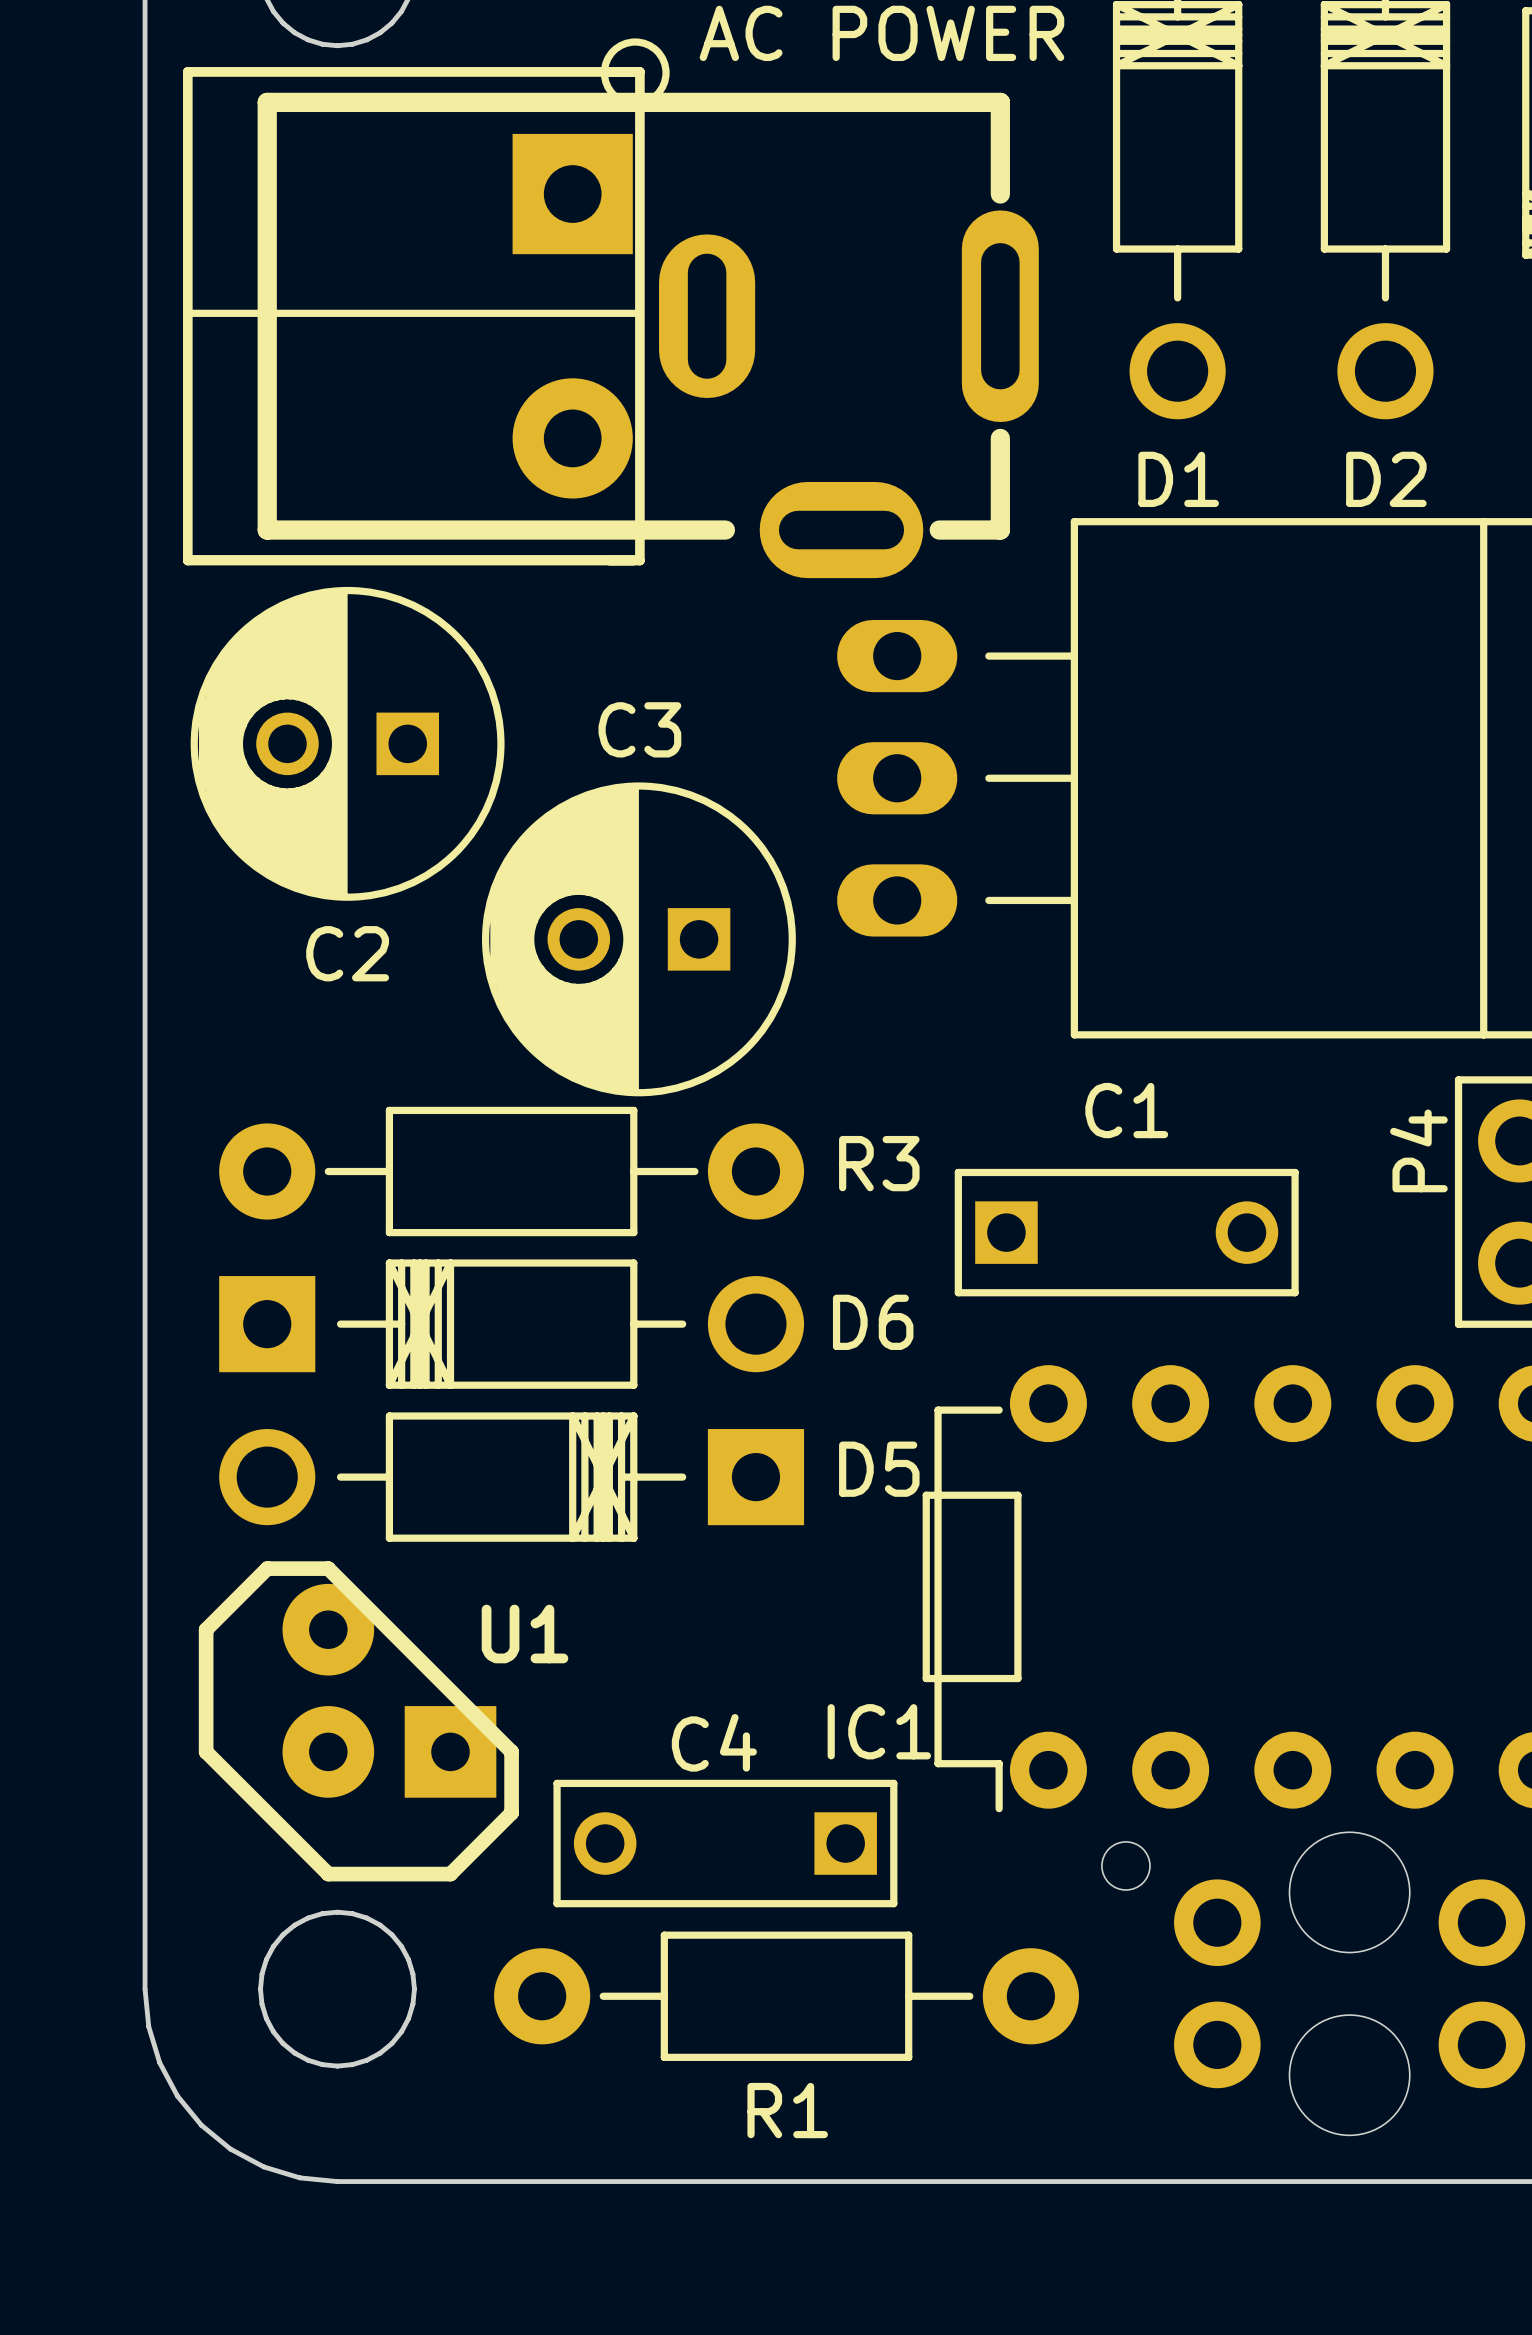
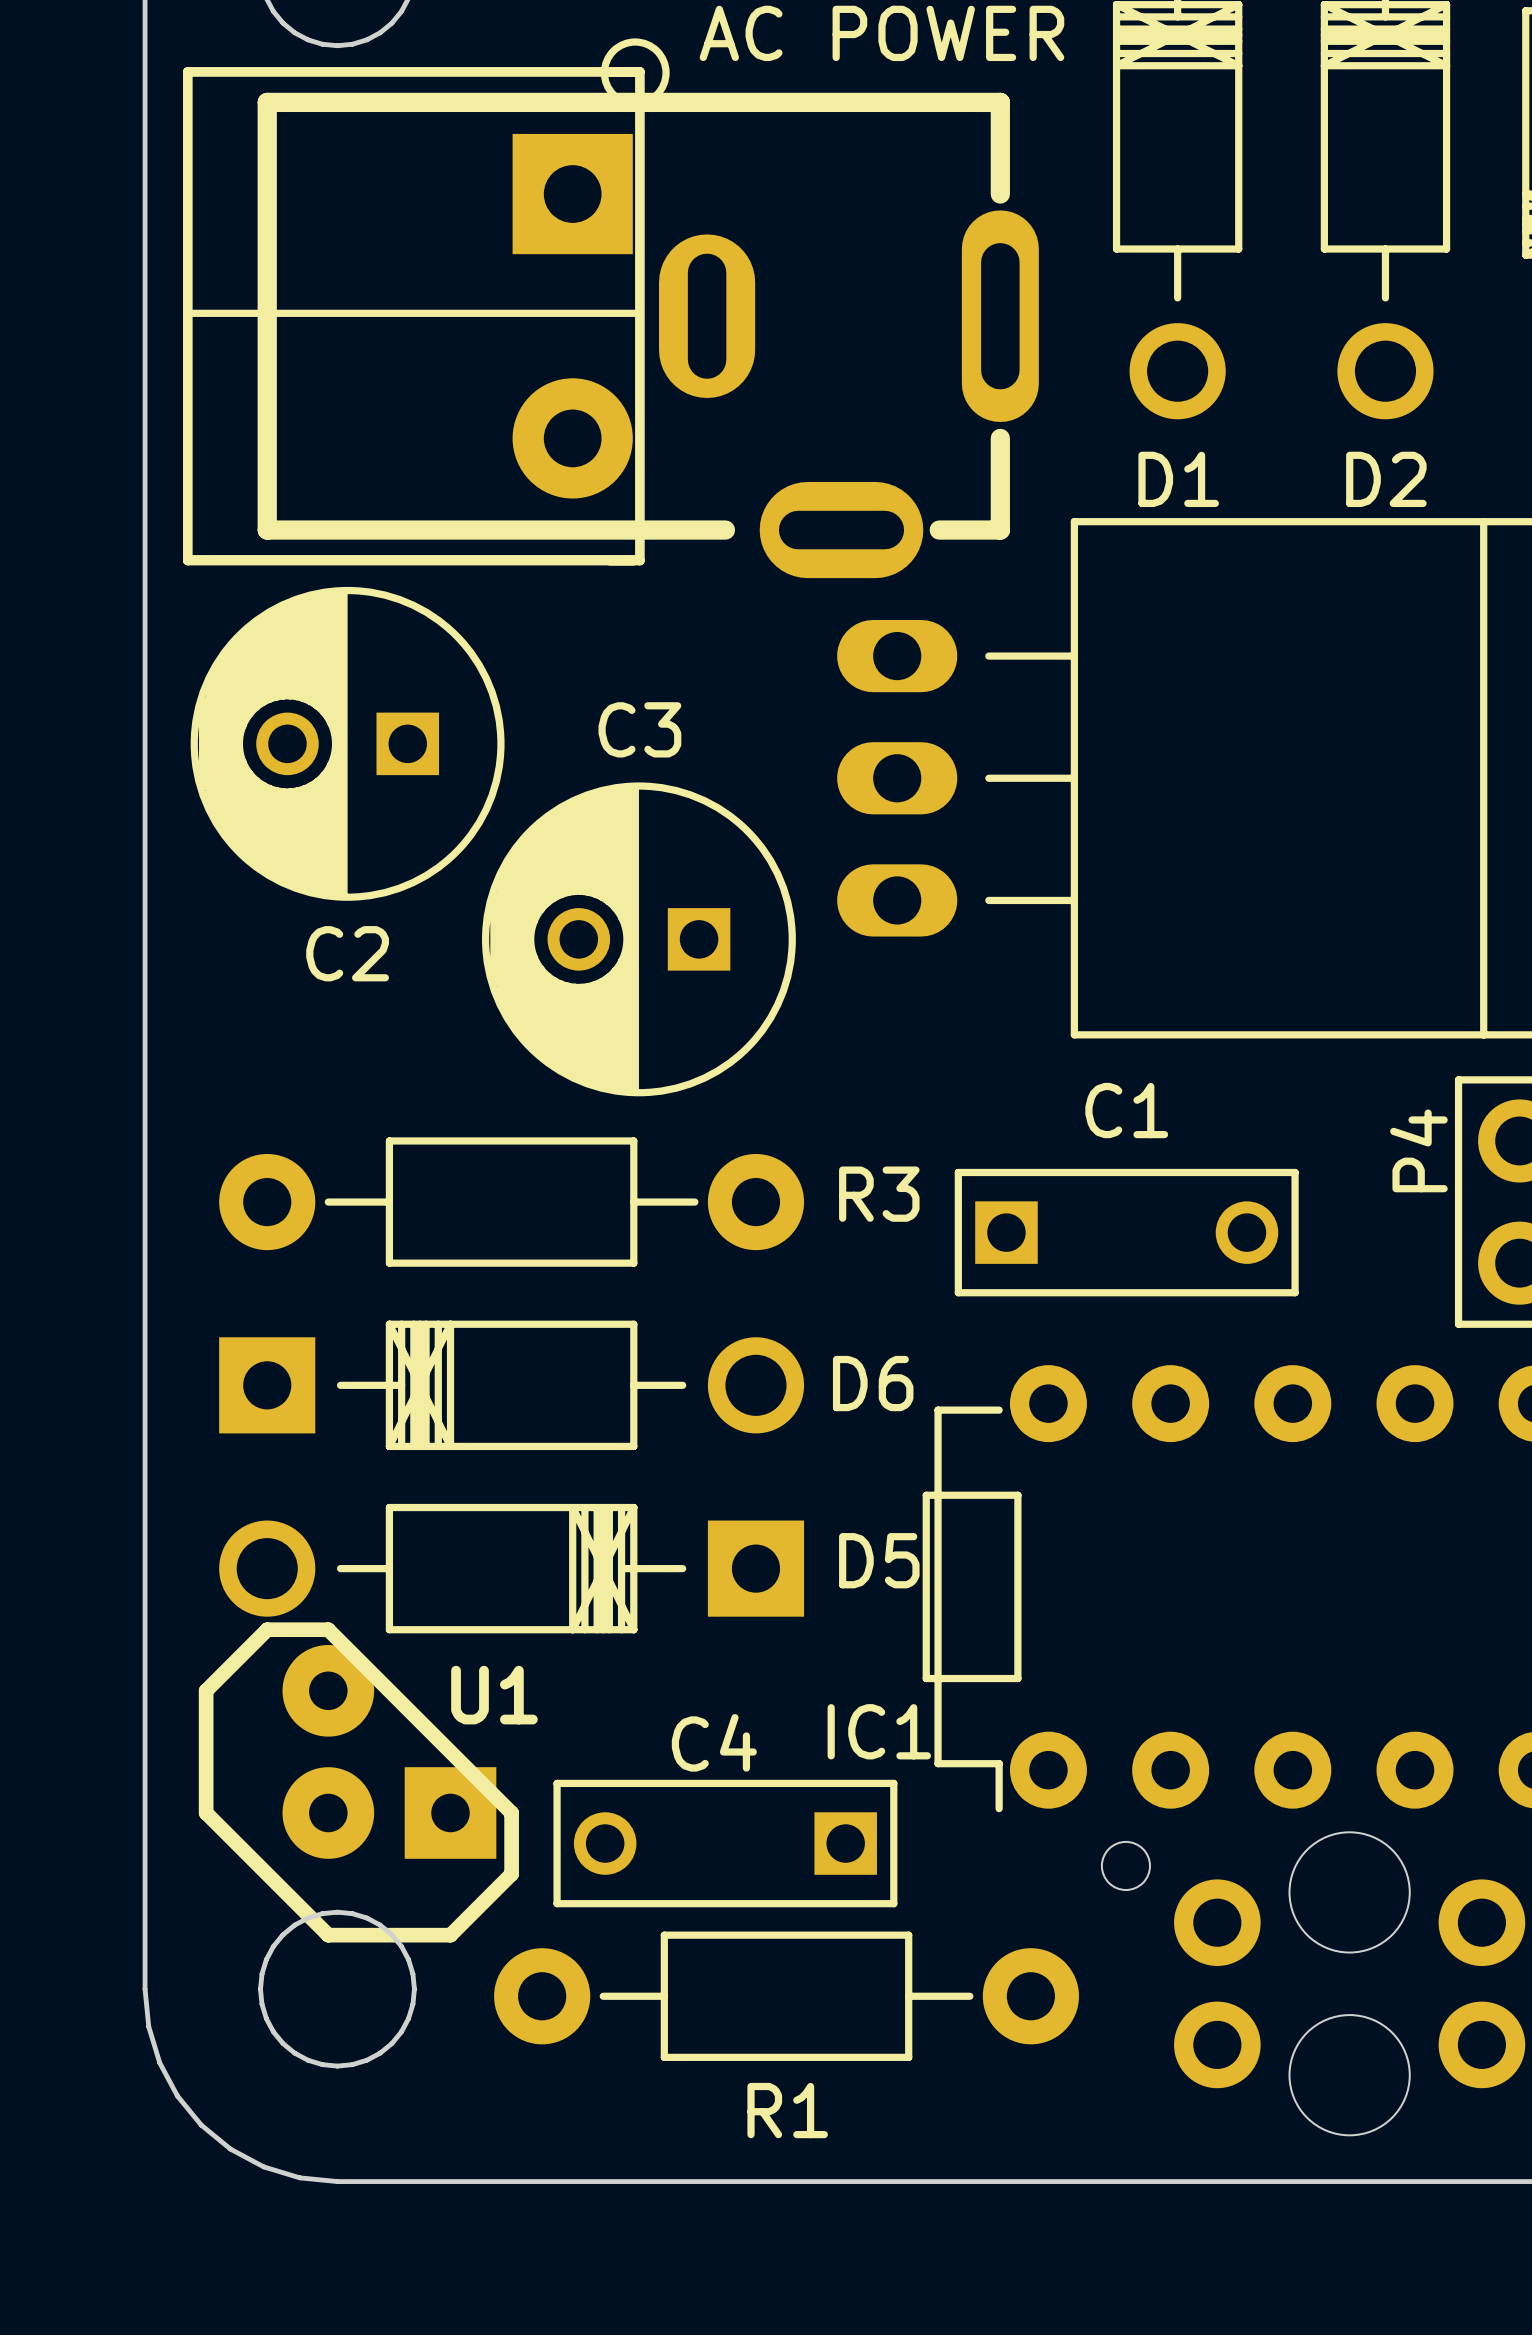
R3 position: (511, 1171) -> (511, 1202)
D6 position: (511, 1324) -> (511, 1385)
D5 position: (511, 1477) -> (511, 1568)
U1 name position: U1 (524, 1633) -> U1 (494, 1695)
U1 position: (358, 1721) -> (358, 1782)

